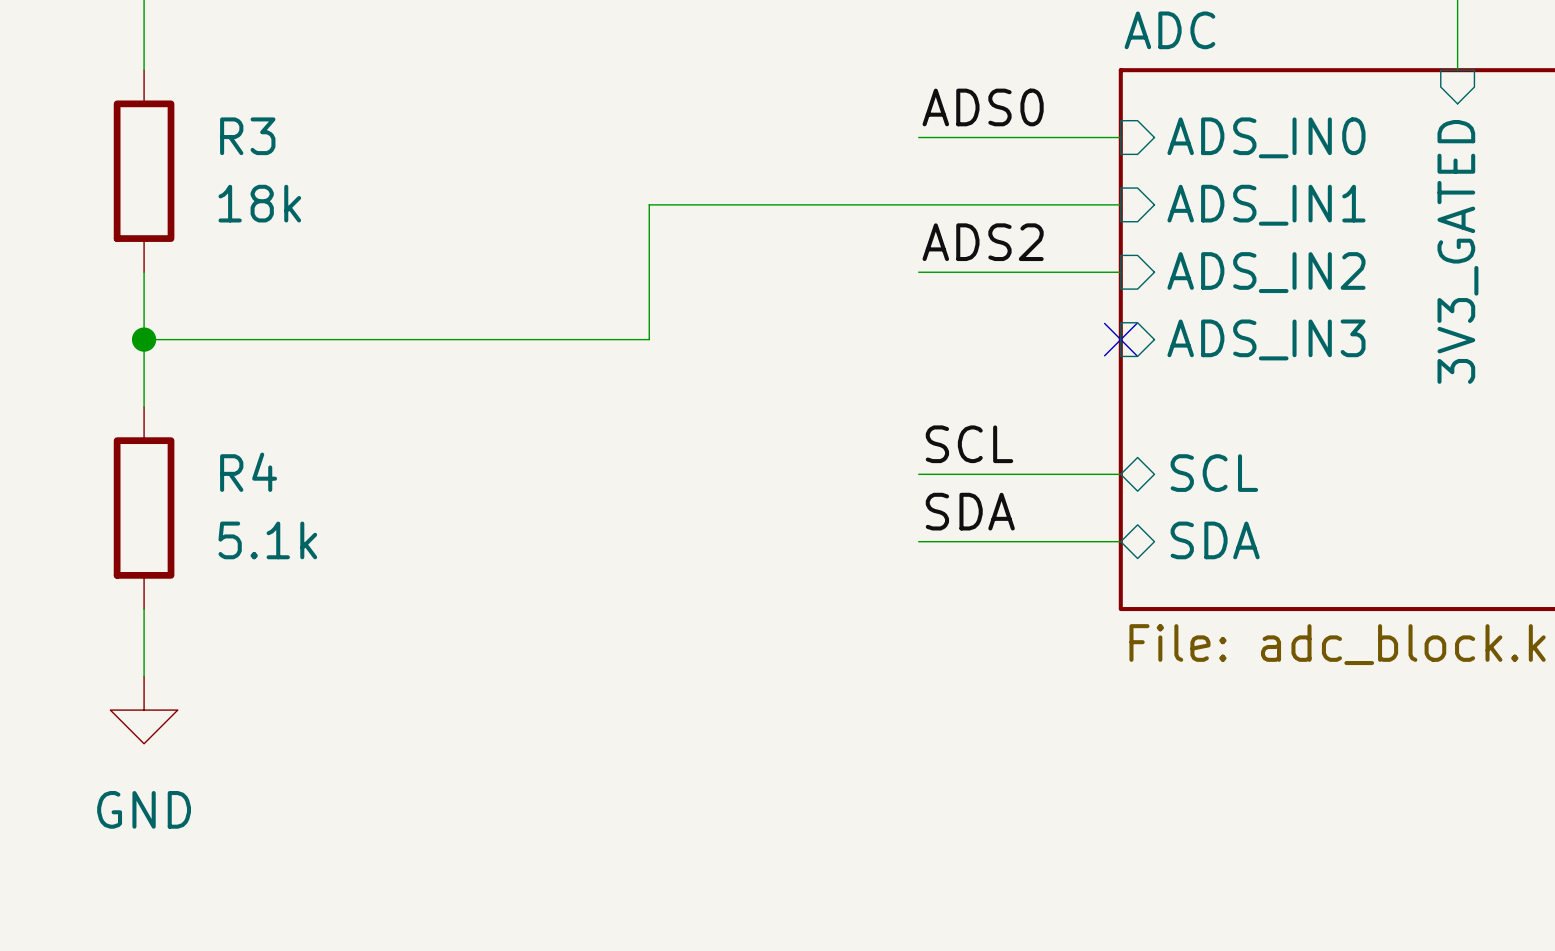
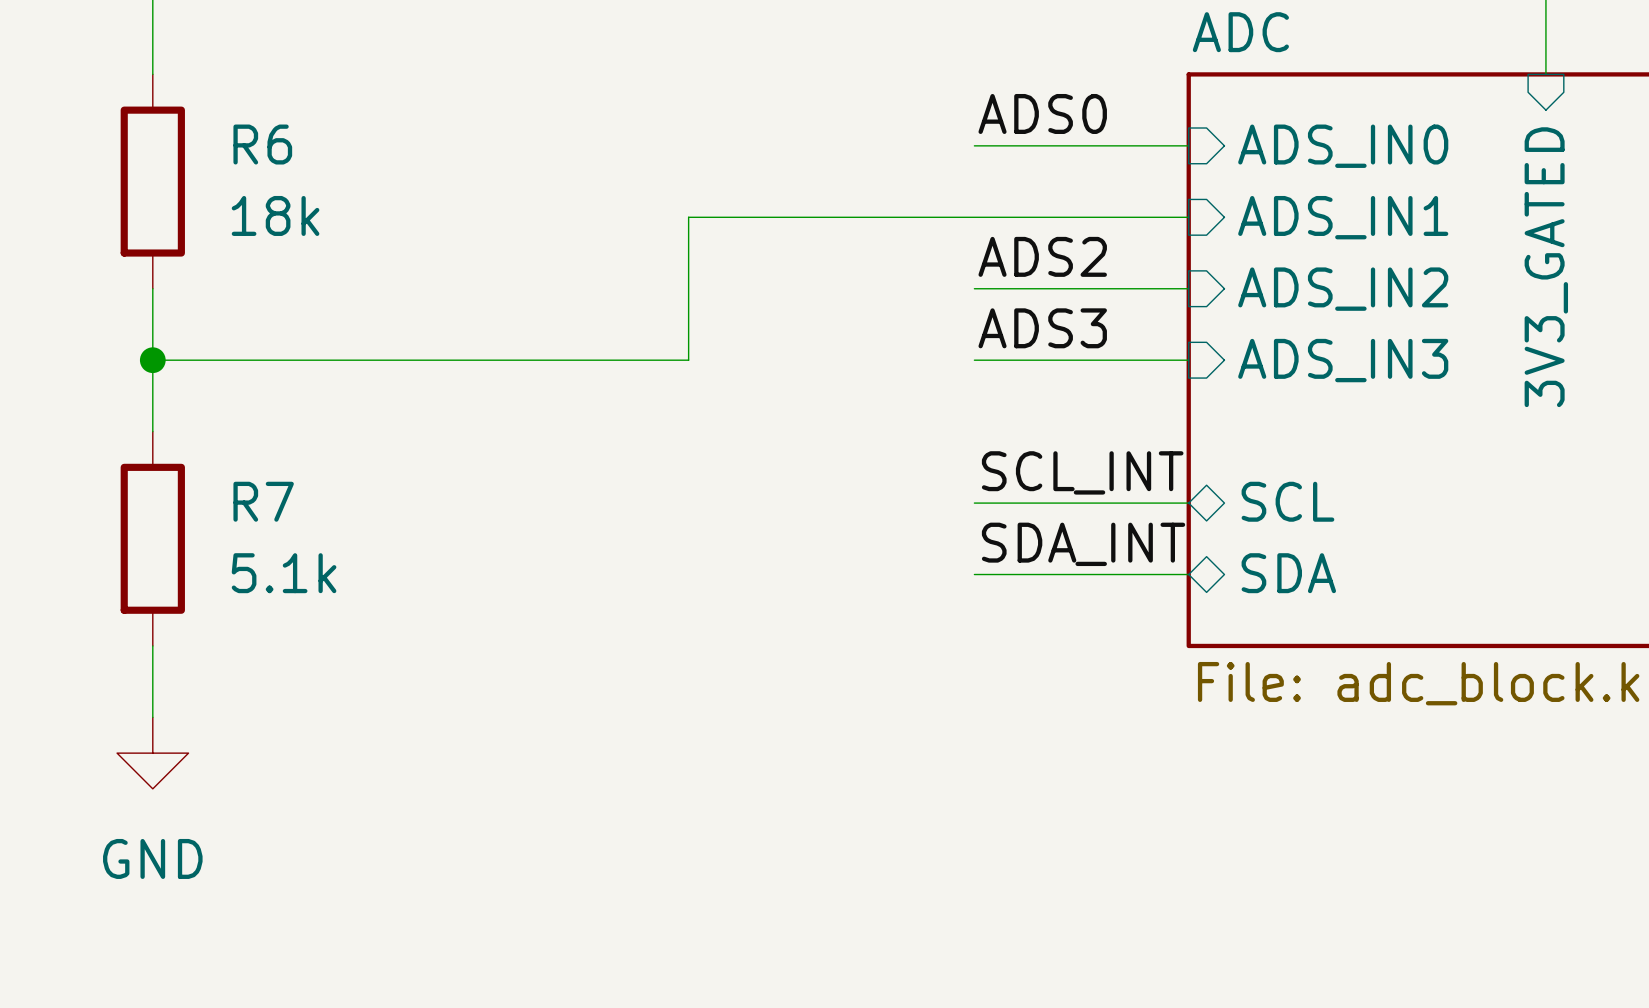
R3 name: R3 (247, 136) -> R6 (262, 144)
label: none -> ADS3 (1042, 328)
wire: none -> (974, 360) (1188, 360)
no-connect mark: (1120, 339) -> none
label: SCL (969, 444) -> SCL_INT (1082, 472)
R4 name: R4 (248, 472) -> R7 (263, 501)
label: SDA (970, 511) -> SDA_INT (1083, 544)

